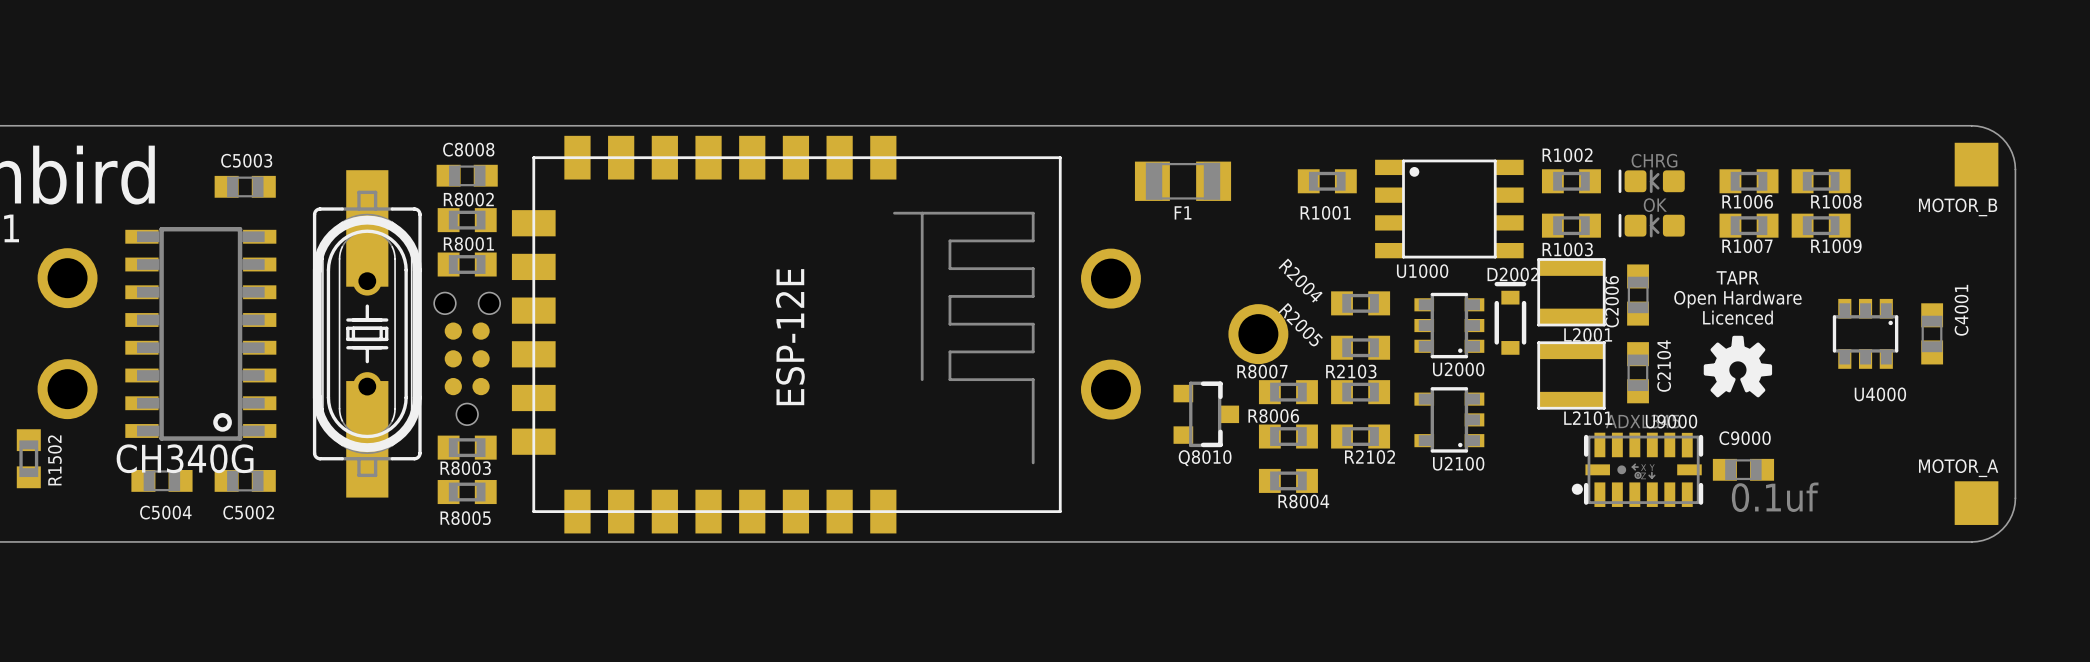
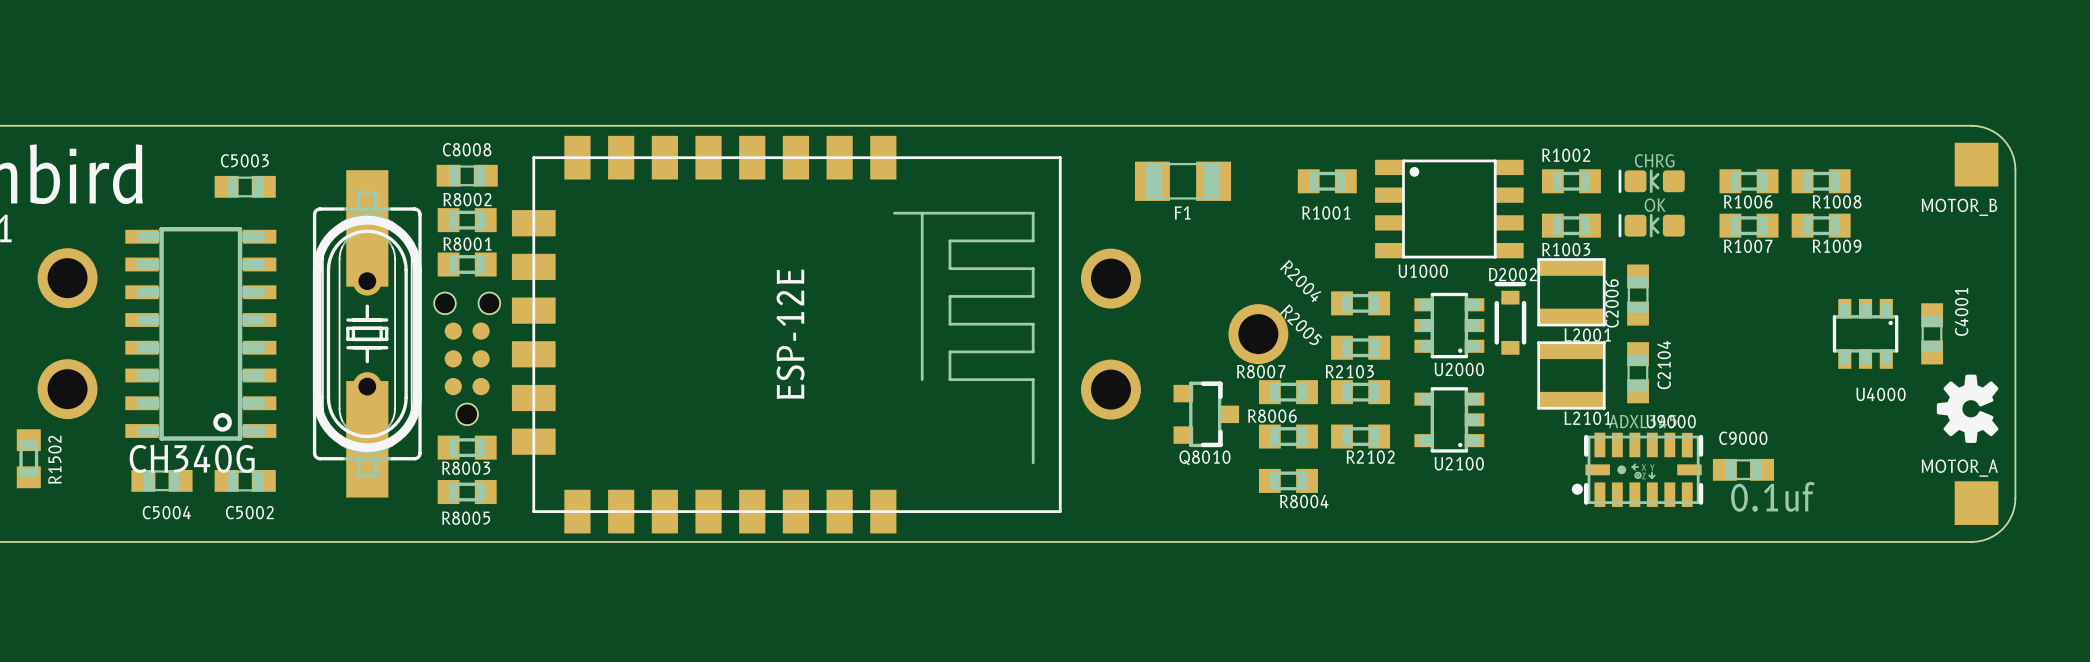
text: TAPR (1737, 277) -> none
text: Open Hardware (1737, 299) -> none
text: Licenced (1737, 317) -> none
drawing: [1703, 335, 1773, 398] -> none
drawing: none -> [1936, 374, 1999, 443]

